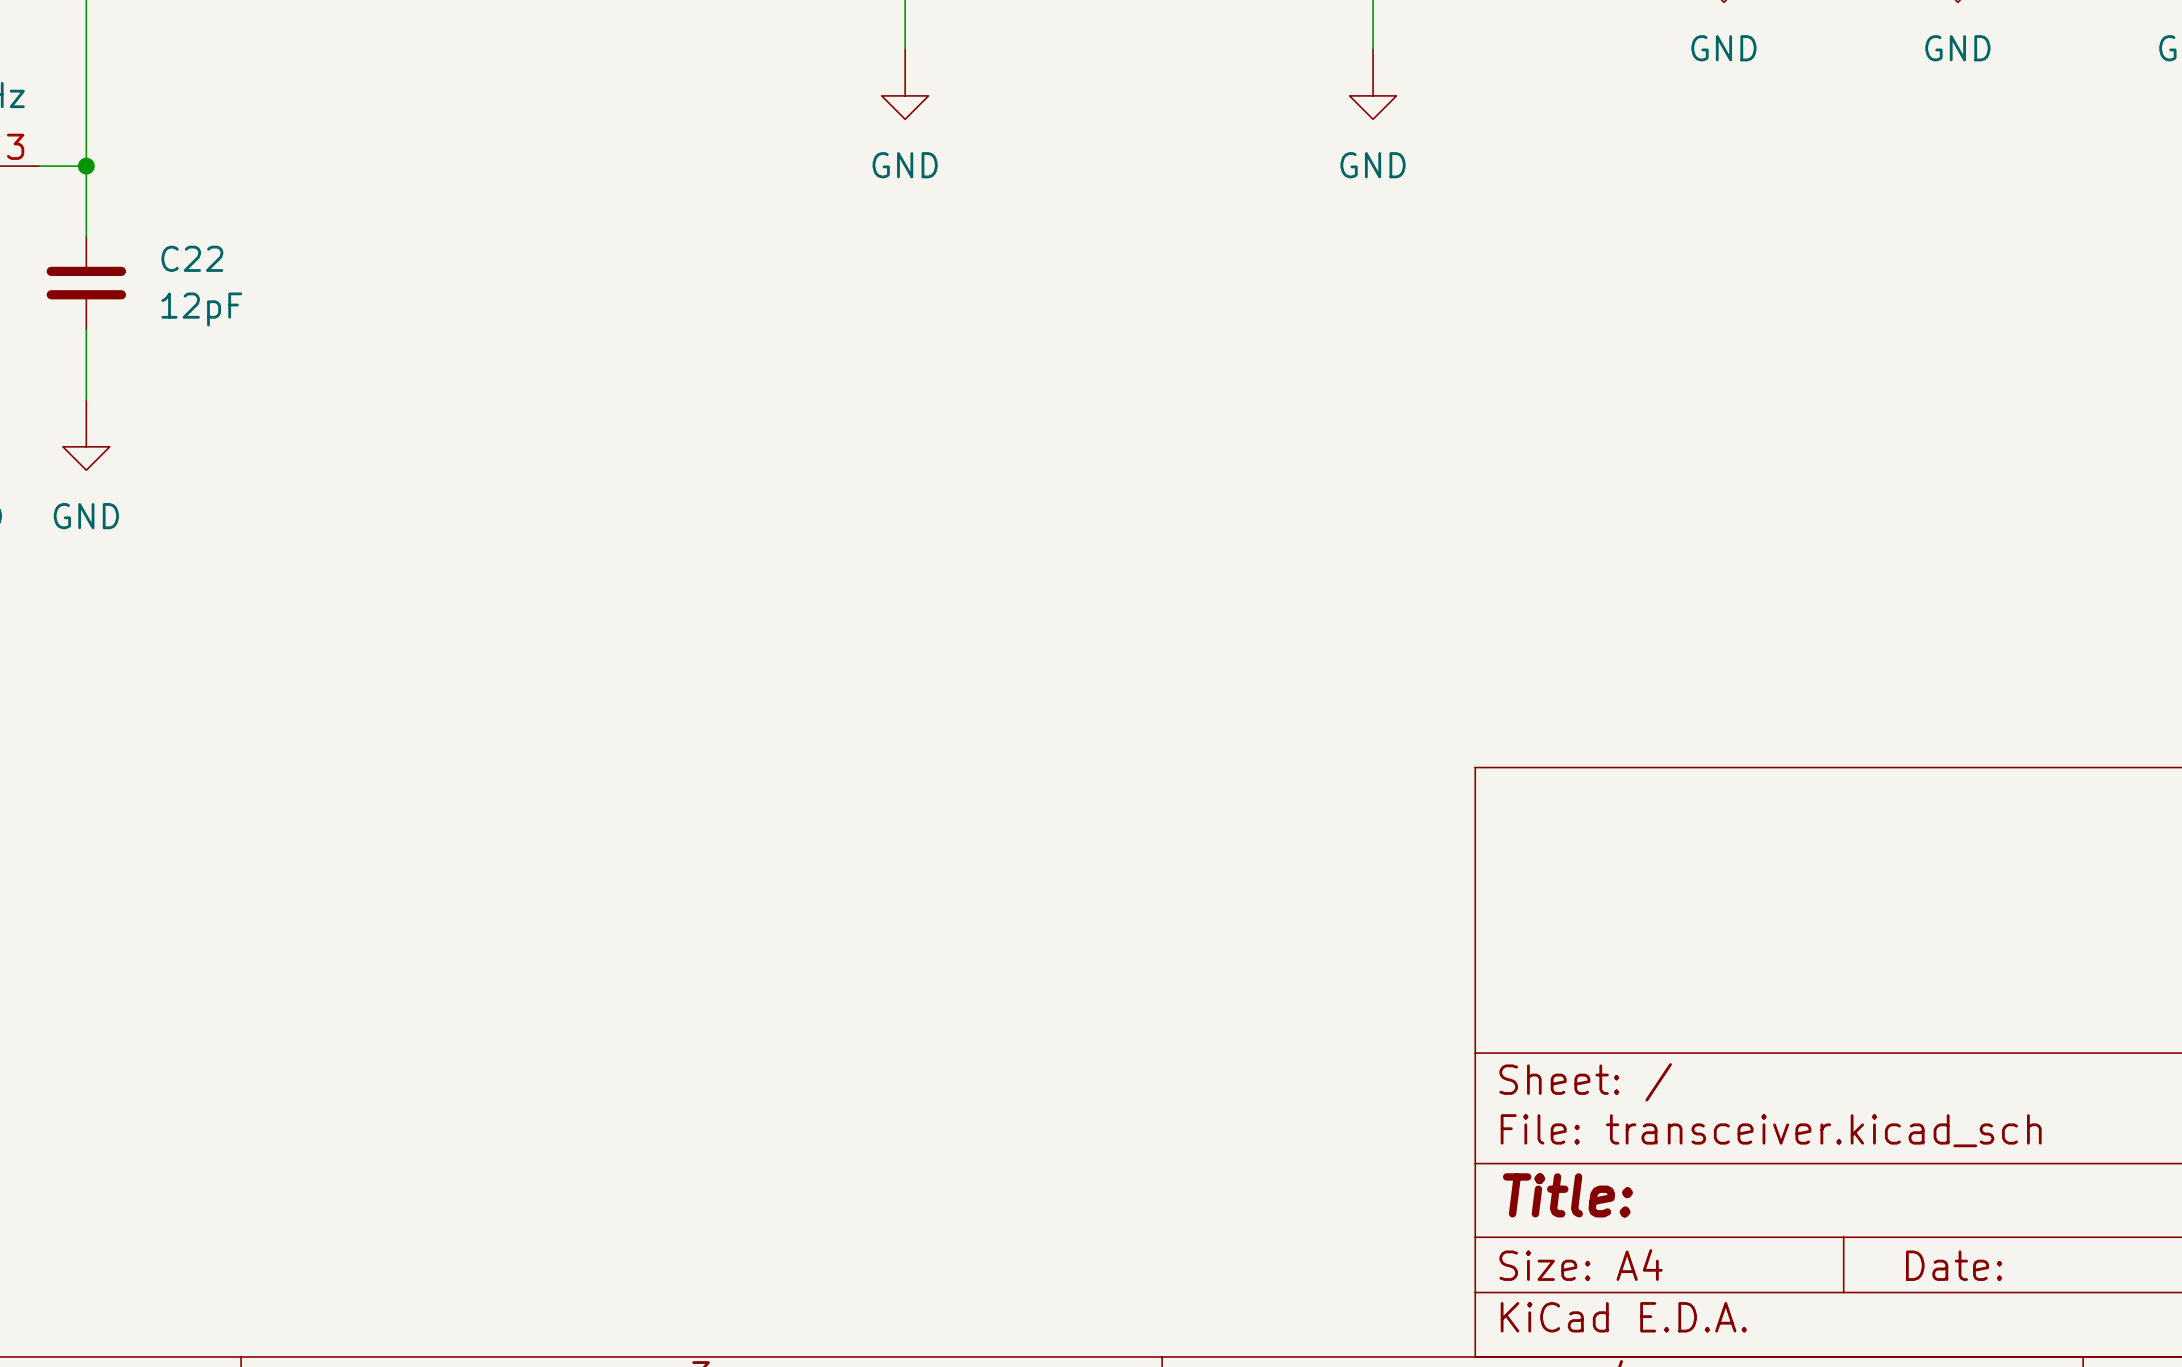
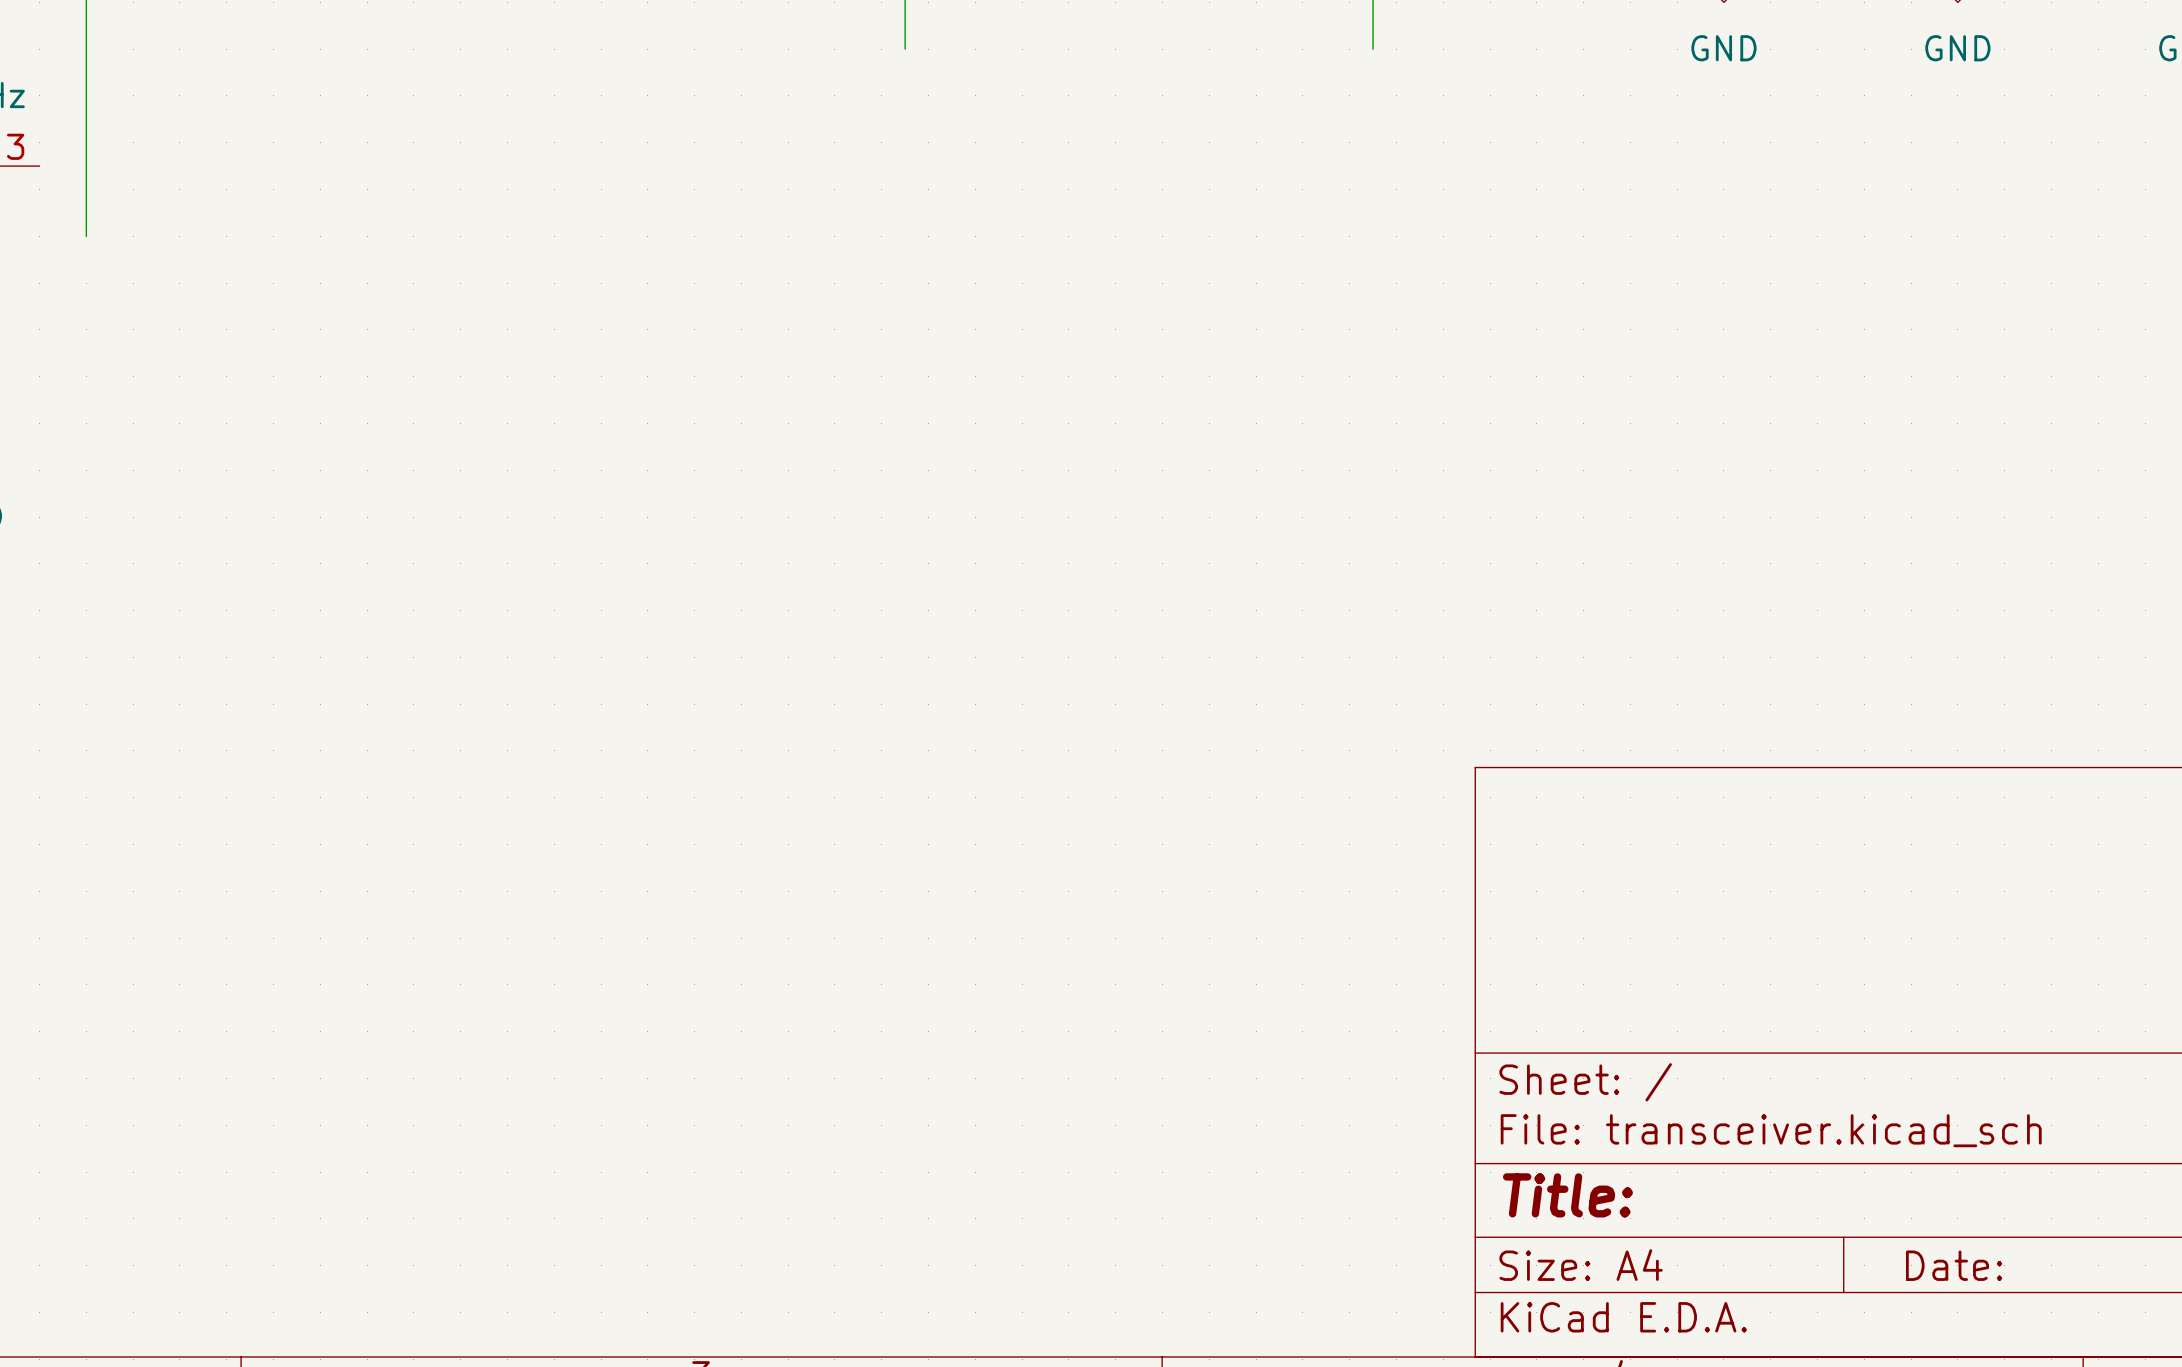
power symbol: GND (905, 84) -> none
power symbol: GND (1373, 84) -> none
wire: (39, 166) (86, 166) -> none
junction: (86, 166) -> none
C22: 12pF (86, 283) -> none
wire: (86, 329) (86, 400) -> none
power symbol: GND (86, 435) -> none

